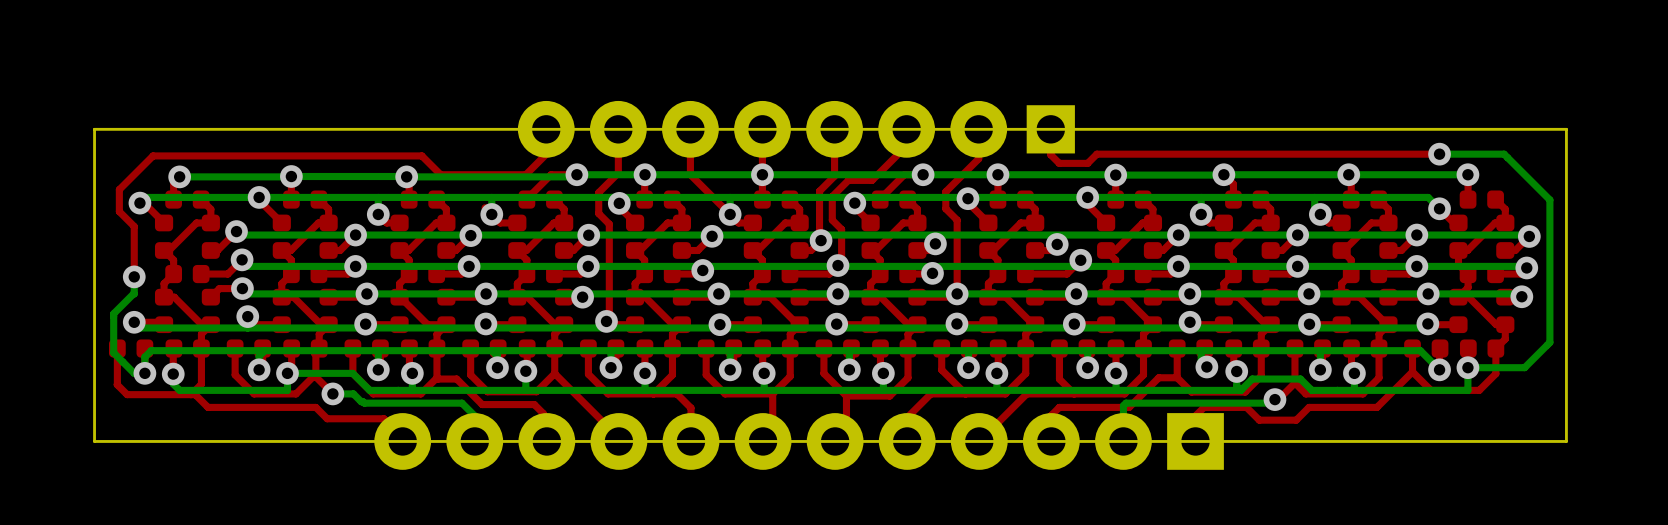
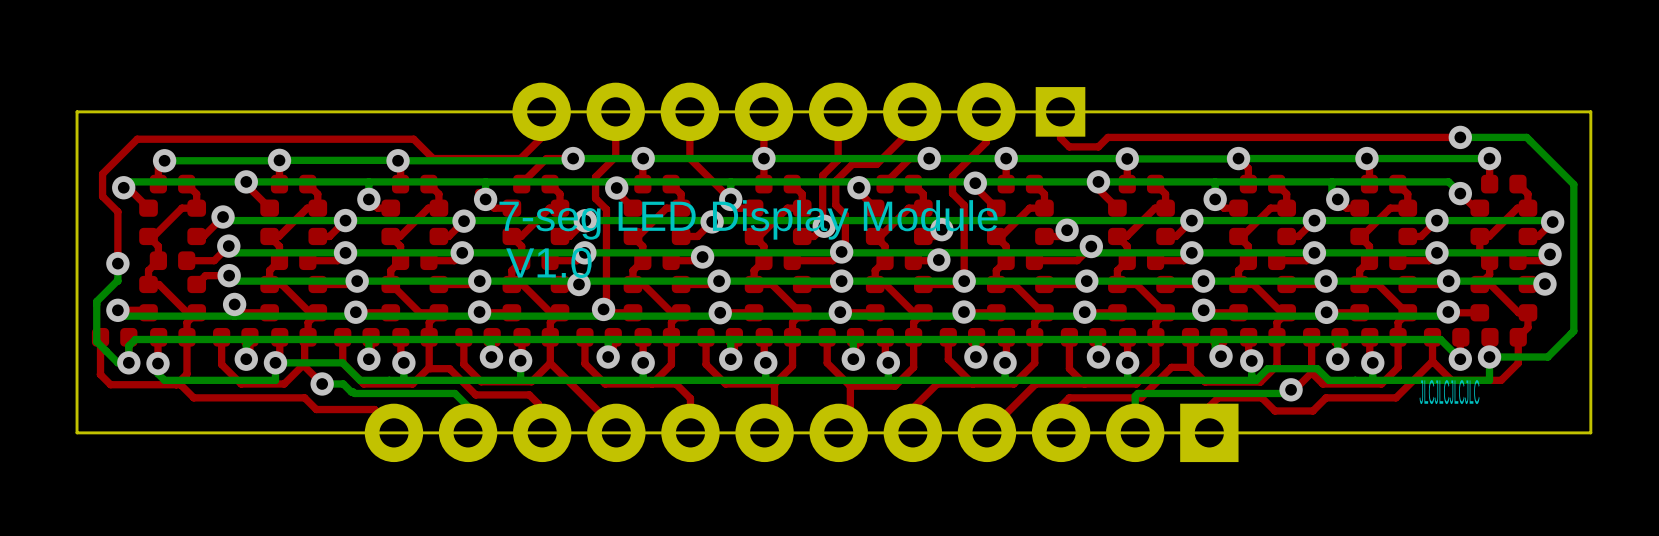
text: none -> 7-seg LED Display Module (748, 219)
text: none -> V1.0 (548, 262)
text: none -> JLCJLCJLCJLC (1449, 392)

